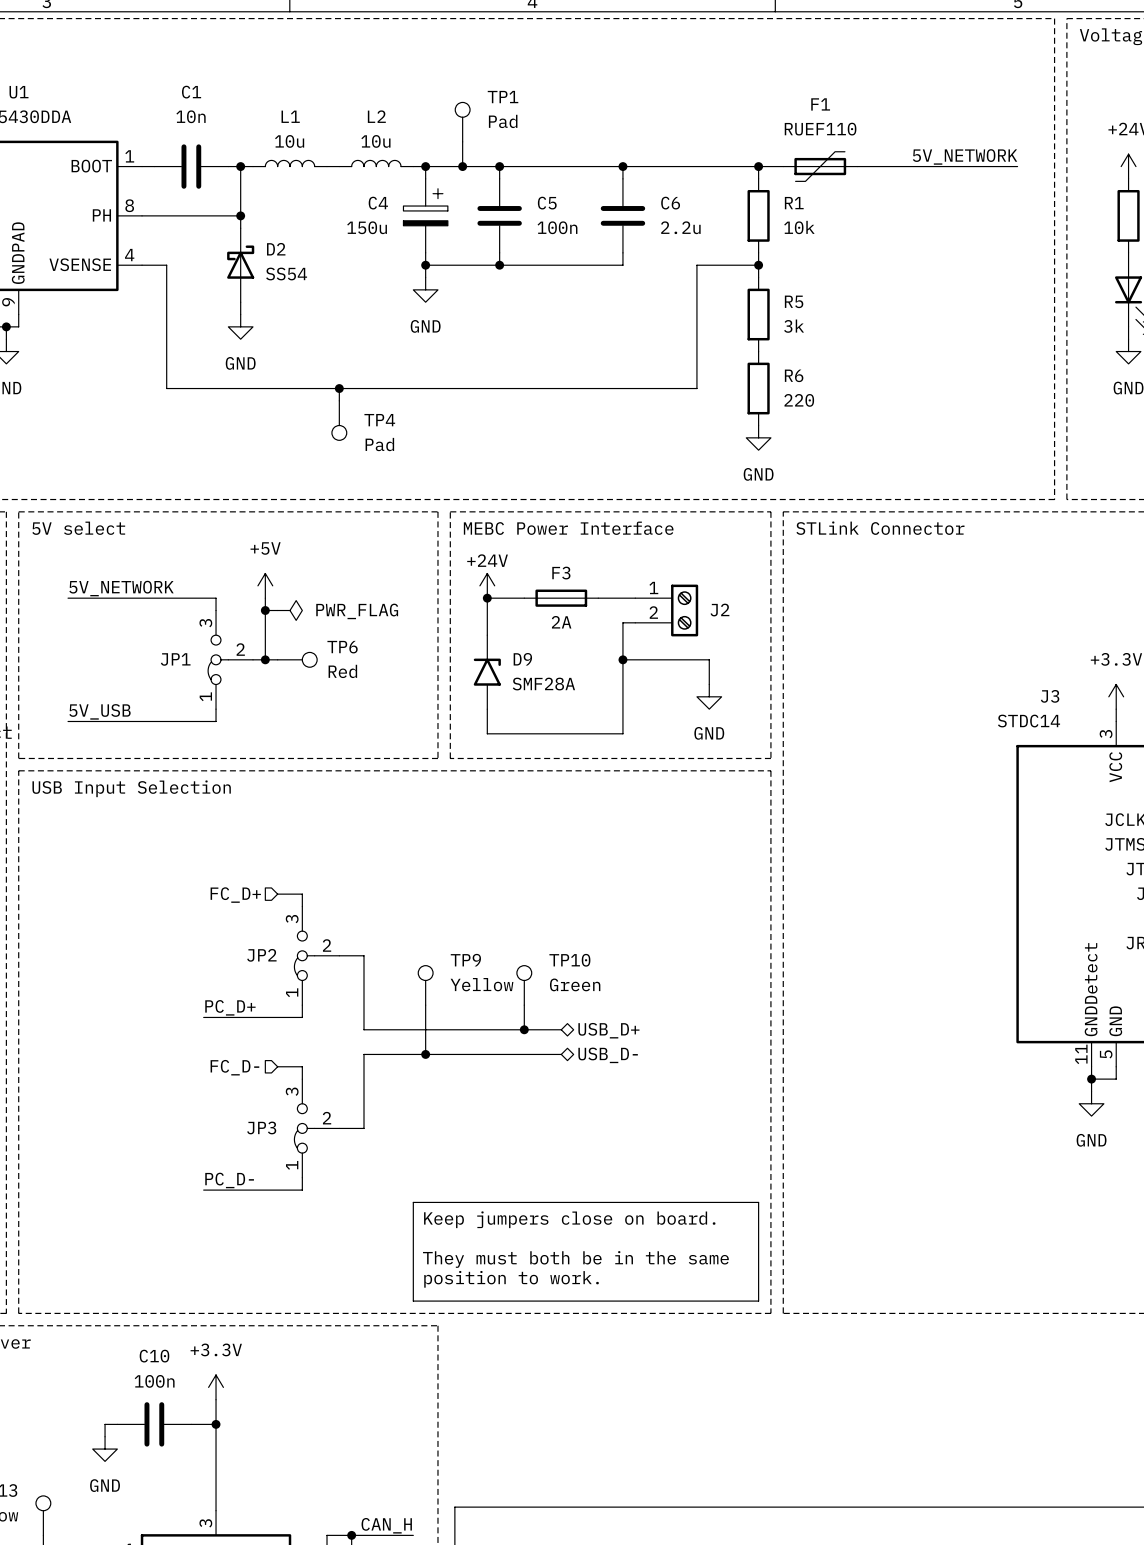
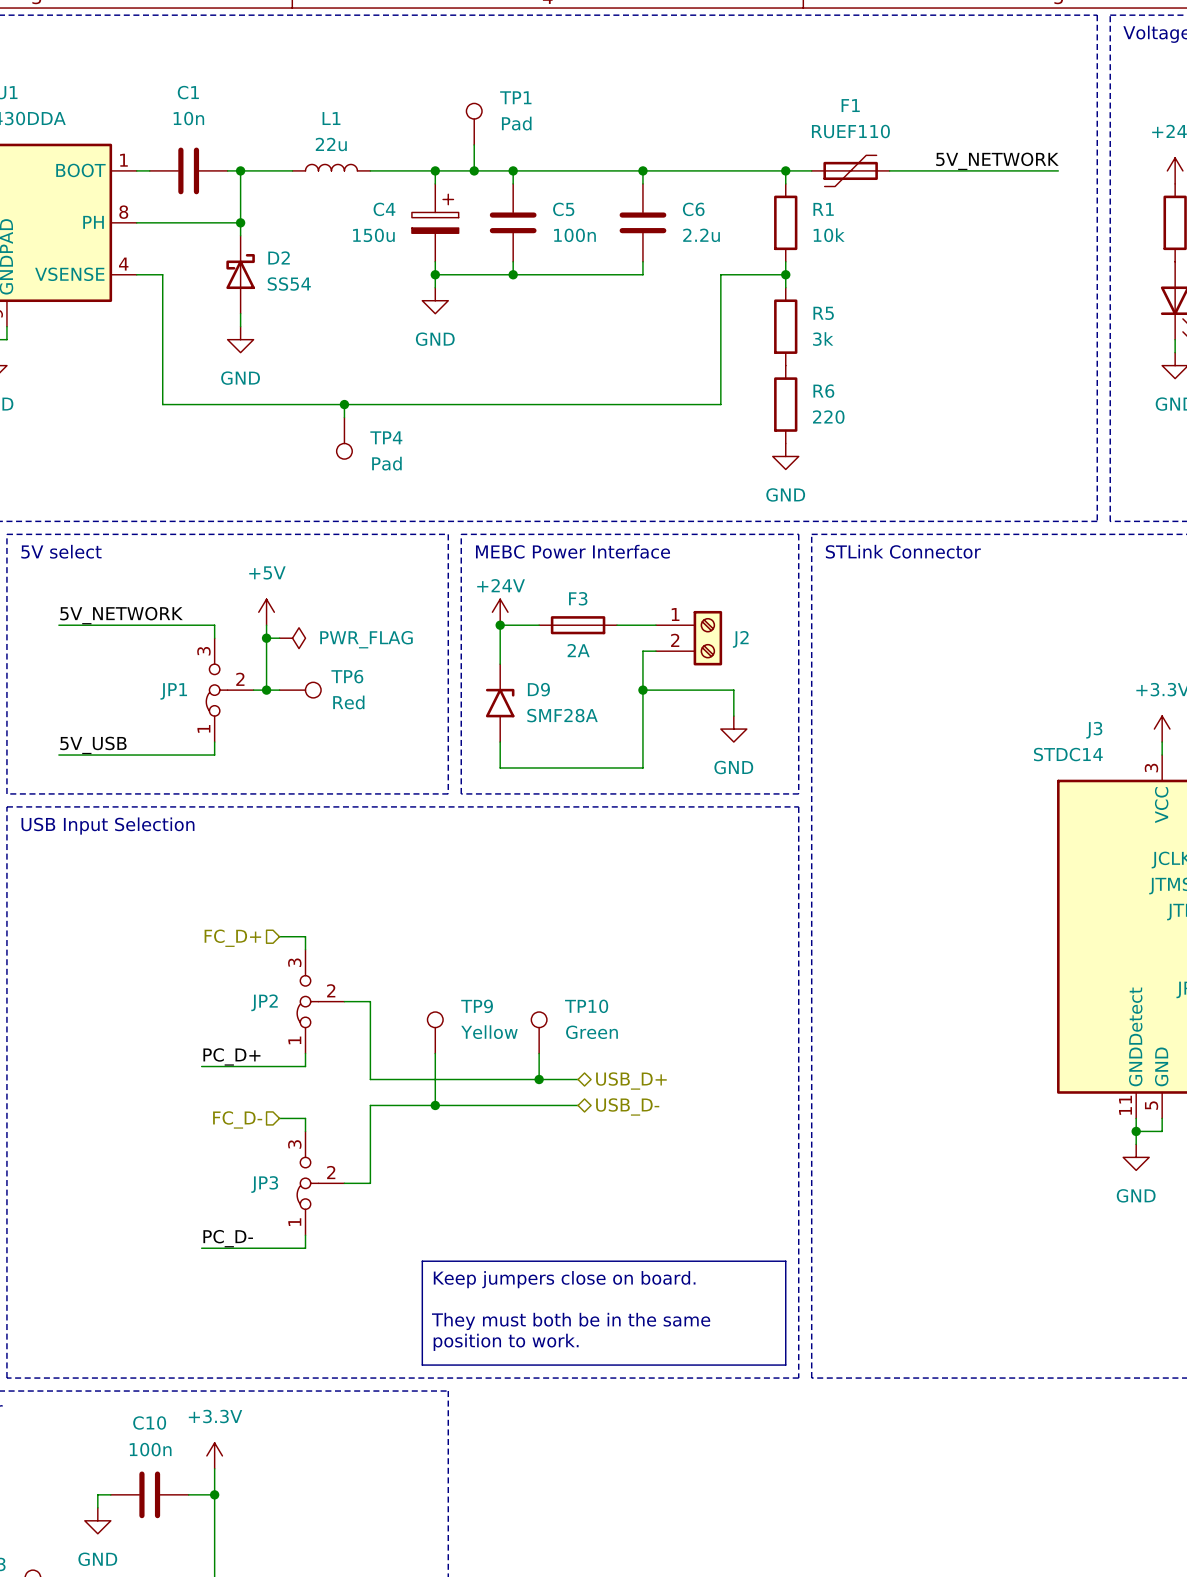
L1 value: 10u (289, 141) -> 22u (331, 144)
L1 position: (290, 163) -> (331, 167)
L2: 10u (376, 163) -> none
wire: none -> (253, 170) (292, 170)
wire: (327, 166) (339, 166) -> none
wire: none -> (370, 170) (422, 170)

